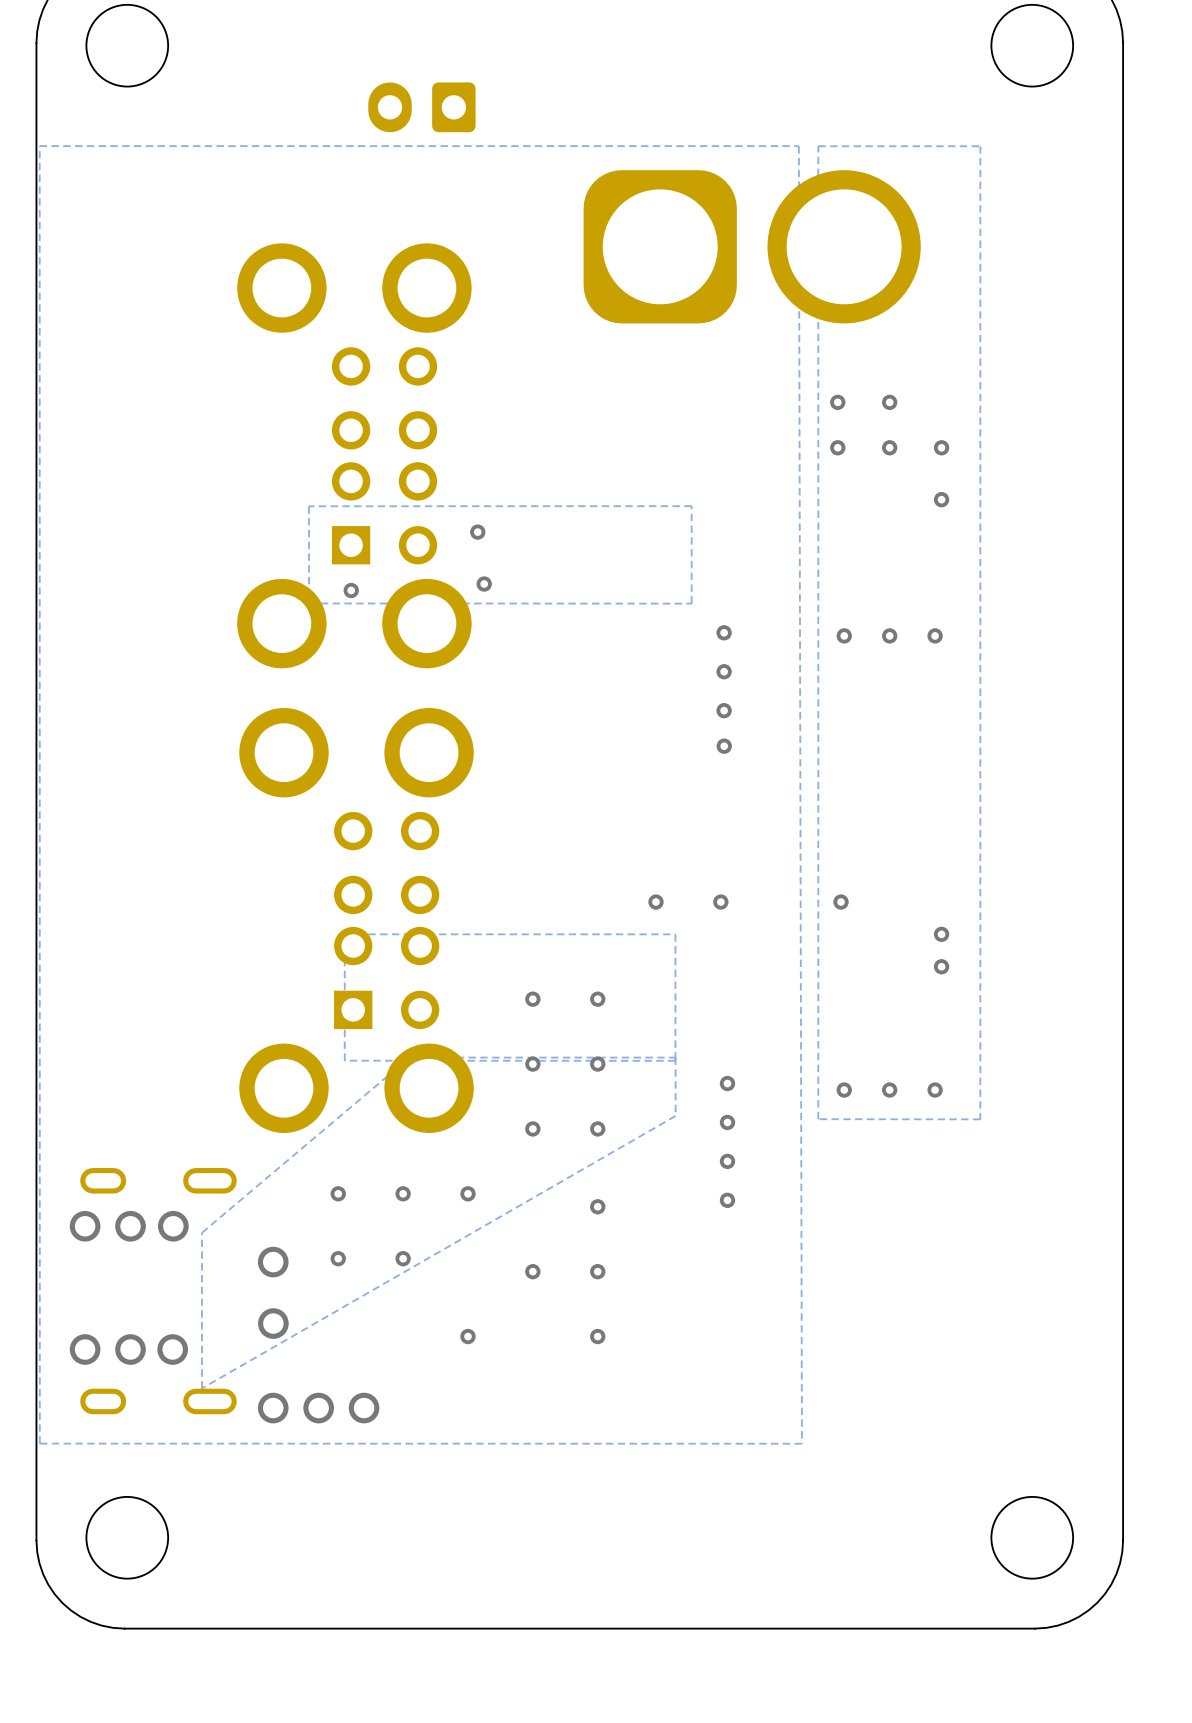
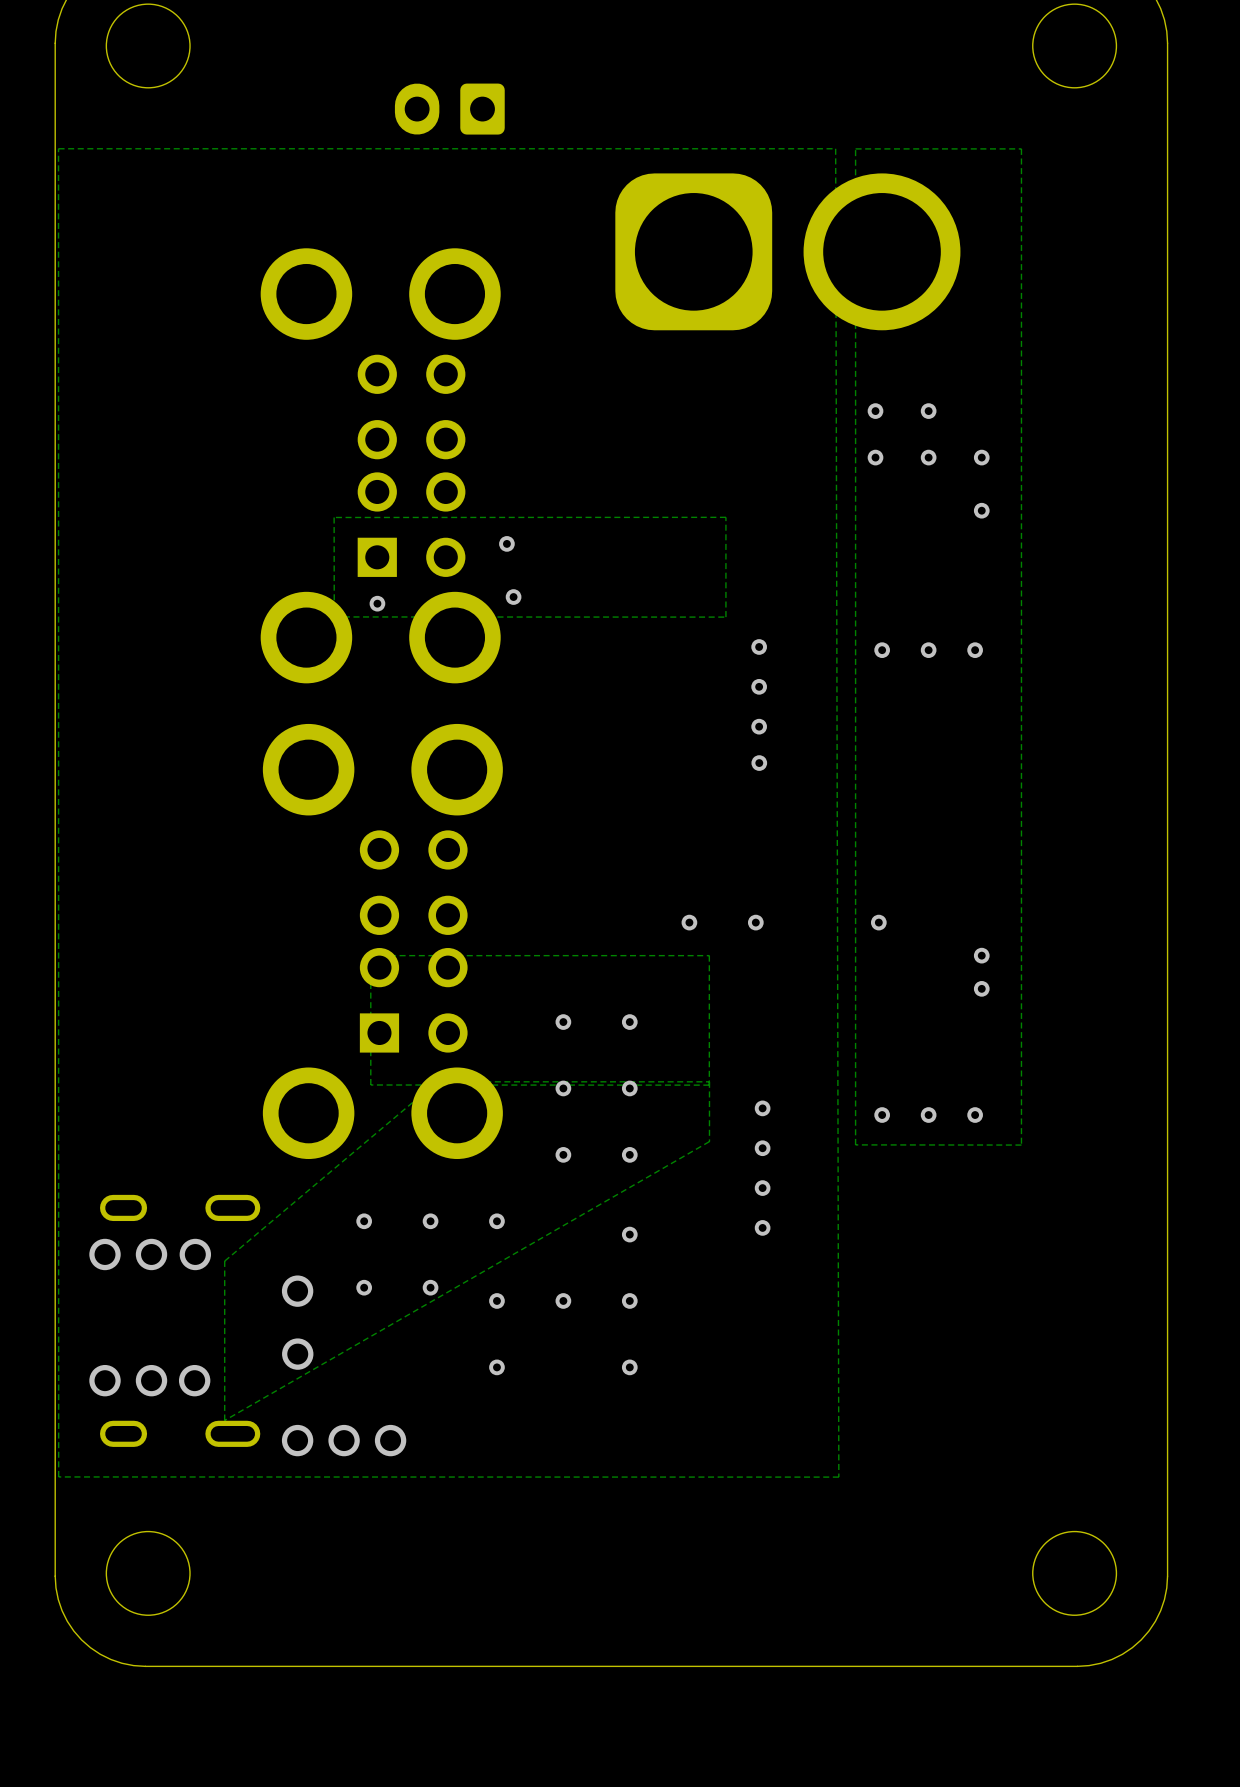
via: none -> (496, 1300)

